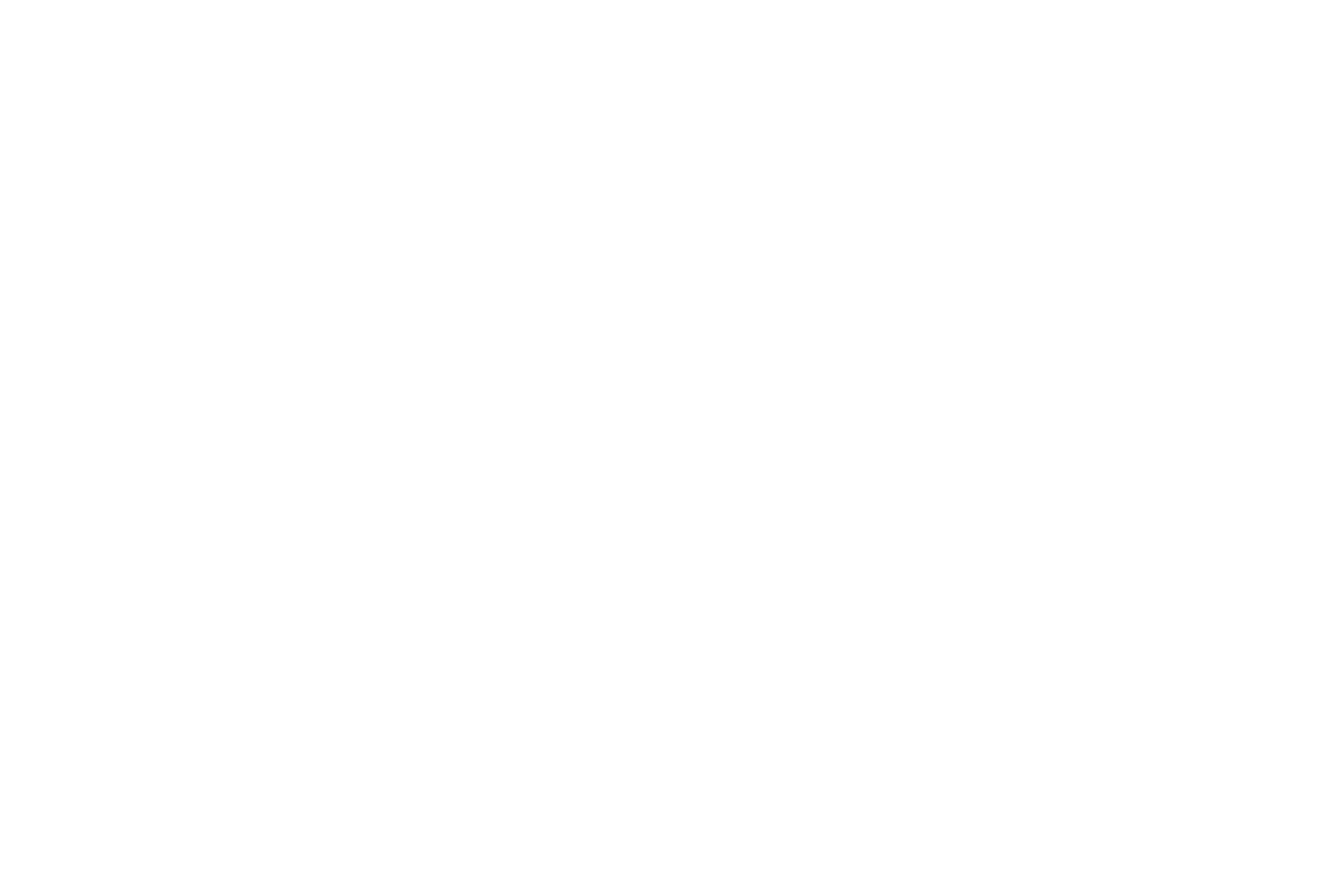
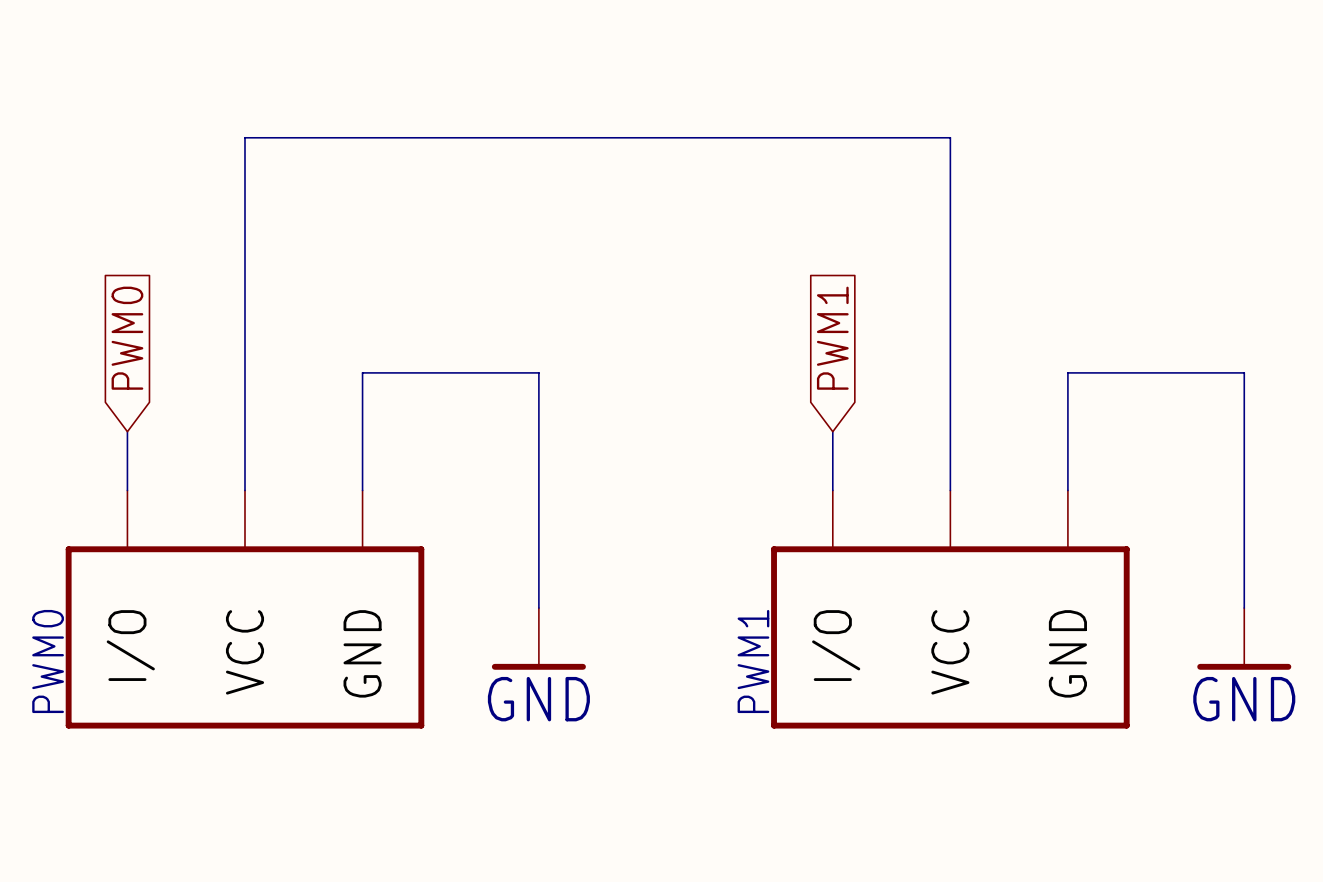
global label: none -> PWM0 (127, 338)
global label: none -> PWM1 (832, 338)
wire: none -> (127, 431) (127, 490)
wire: none -> (832, 431) (832, 490)
wire: none -> (244, 490) (244, 137) (950, 137) (950, 490)
wire: none -> (362, 490) (362, 372) (538, 372) (538, 608)
wire: none -> (1067, 490) (1067, 372) (1244, 372) (1244, 608)
PWM0: none -> (244, 609)
PWM1: none -> (950, 609)
power symbol: none -> GND (538, 638)
power symbol: none -> GND (1244, 638)

